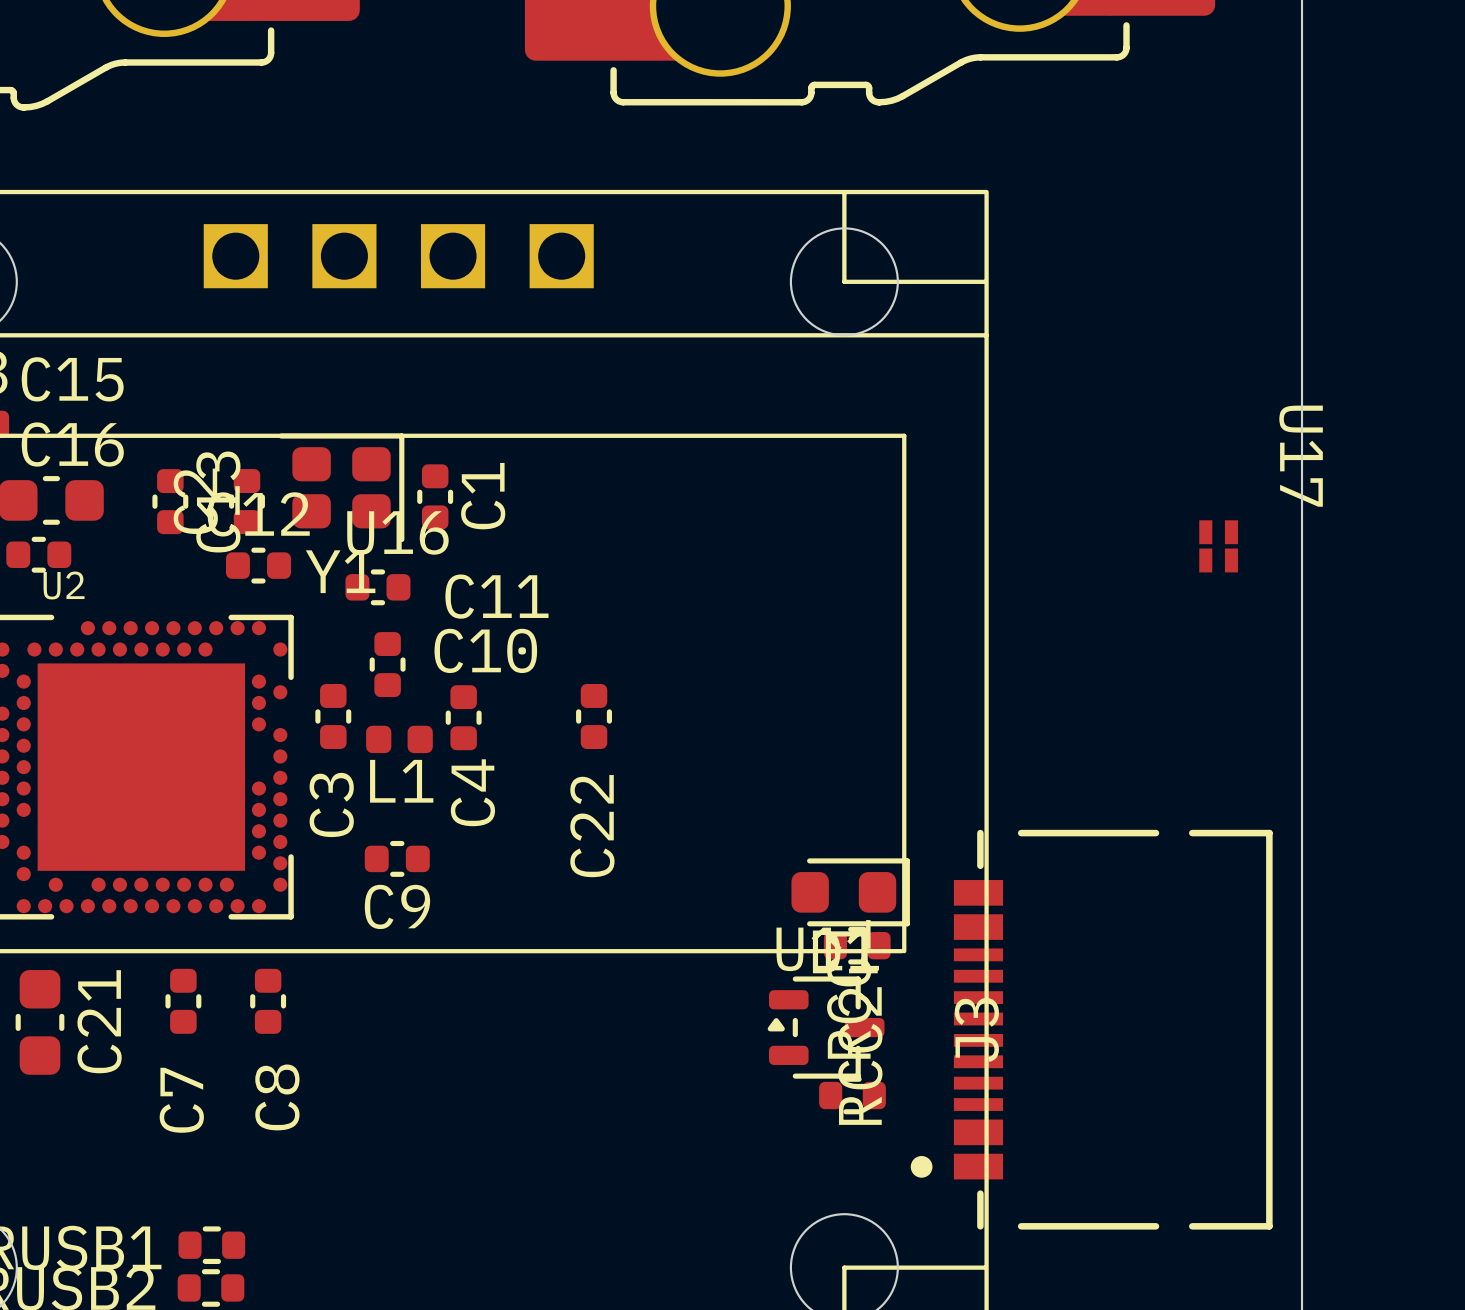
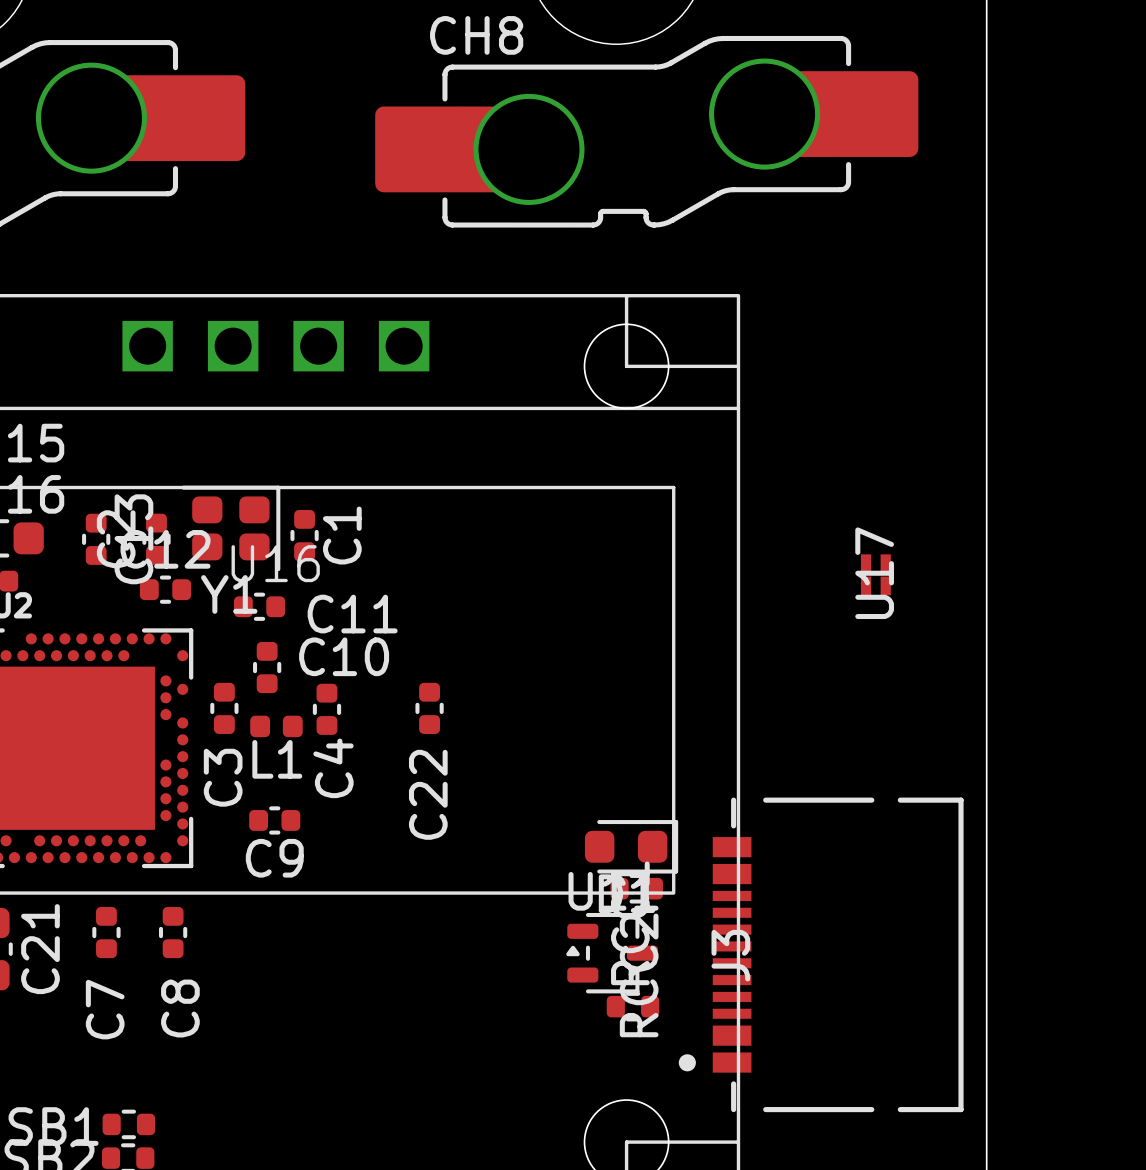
U17 name rotation: 0° (1301, 456) -> 180° (874, 573)
U17 position: (1218, 546) -> (875, 574)

